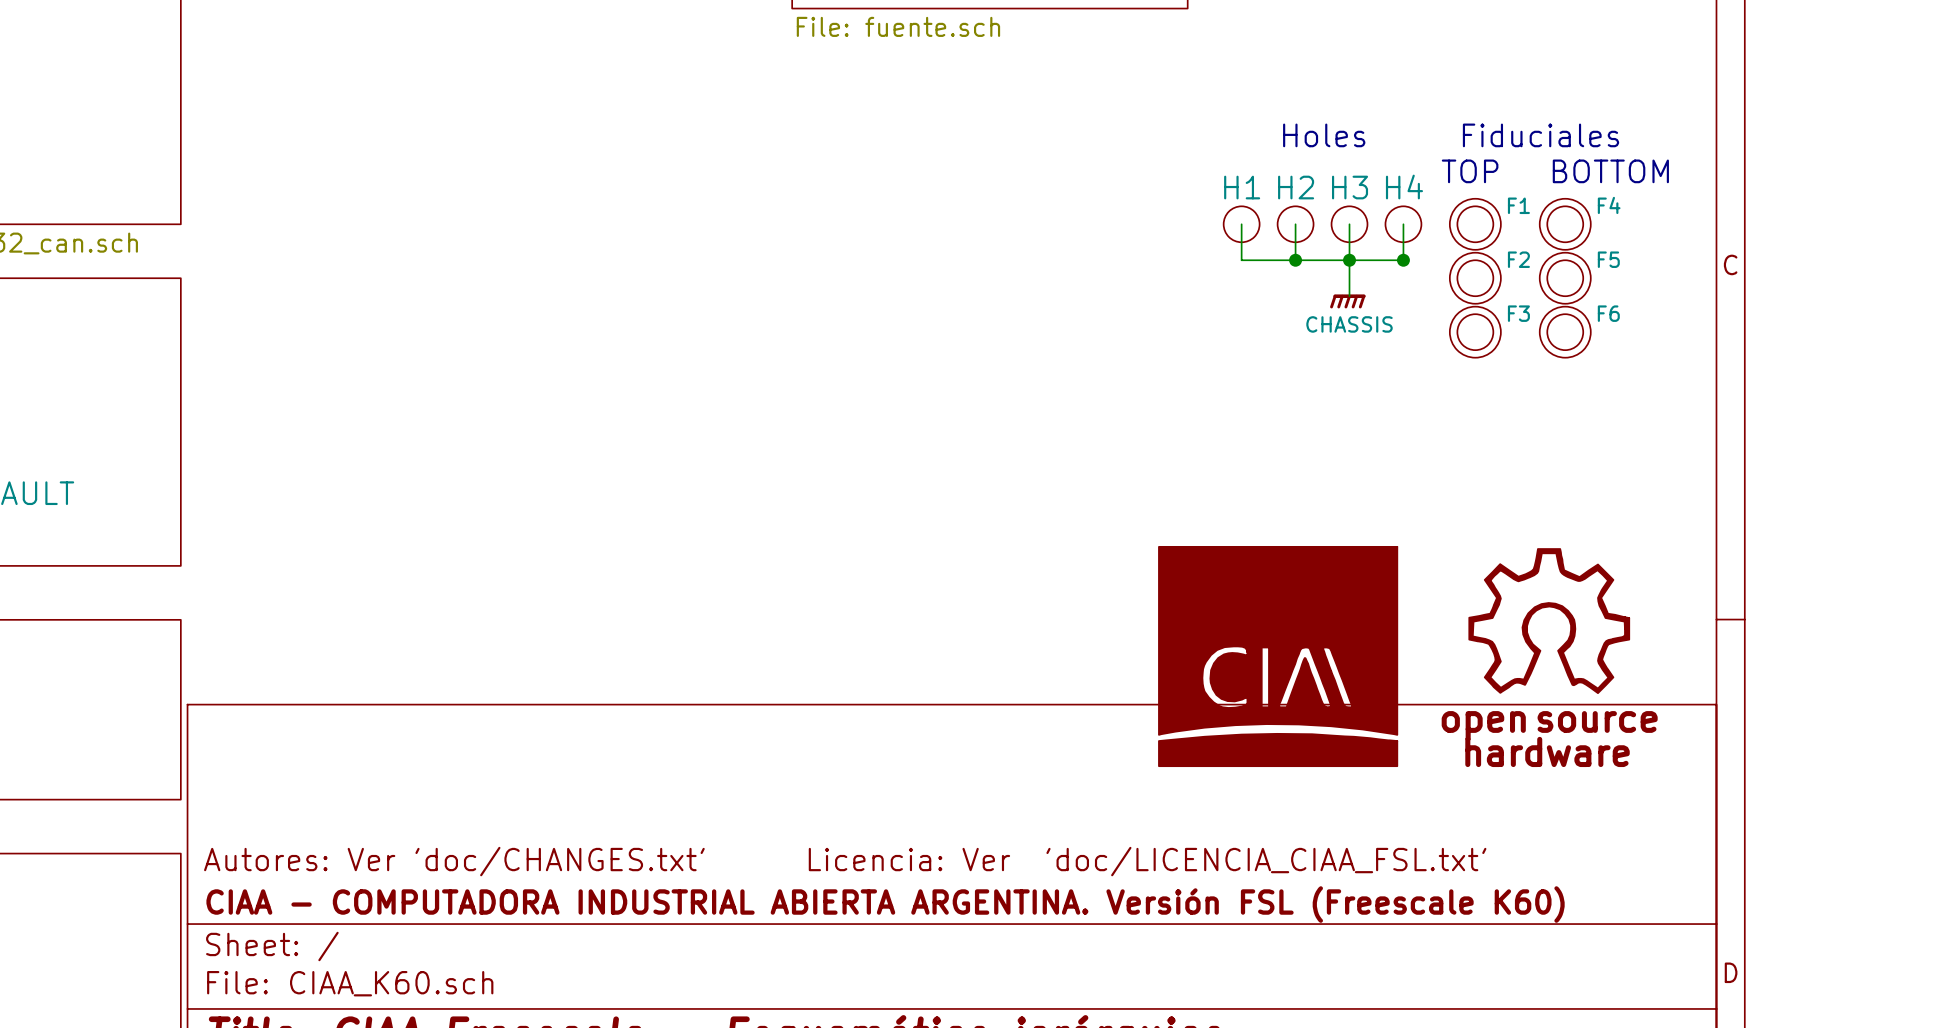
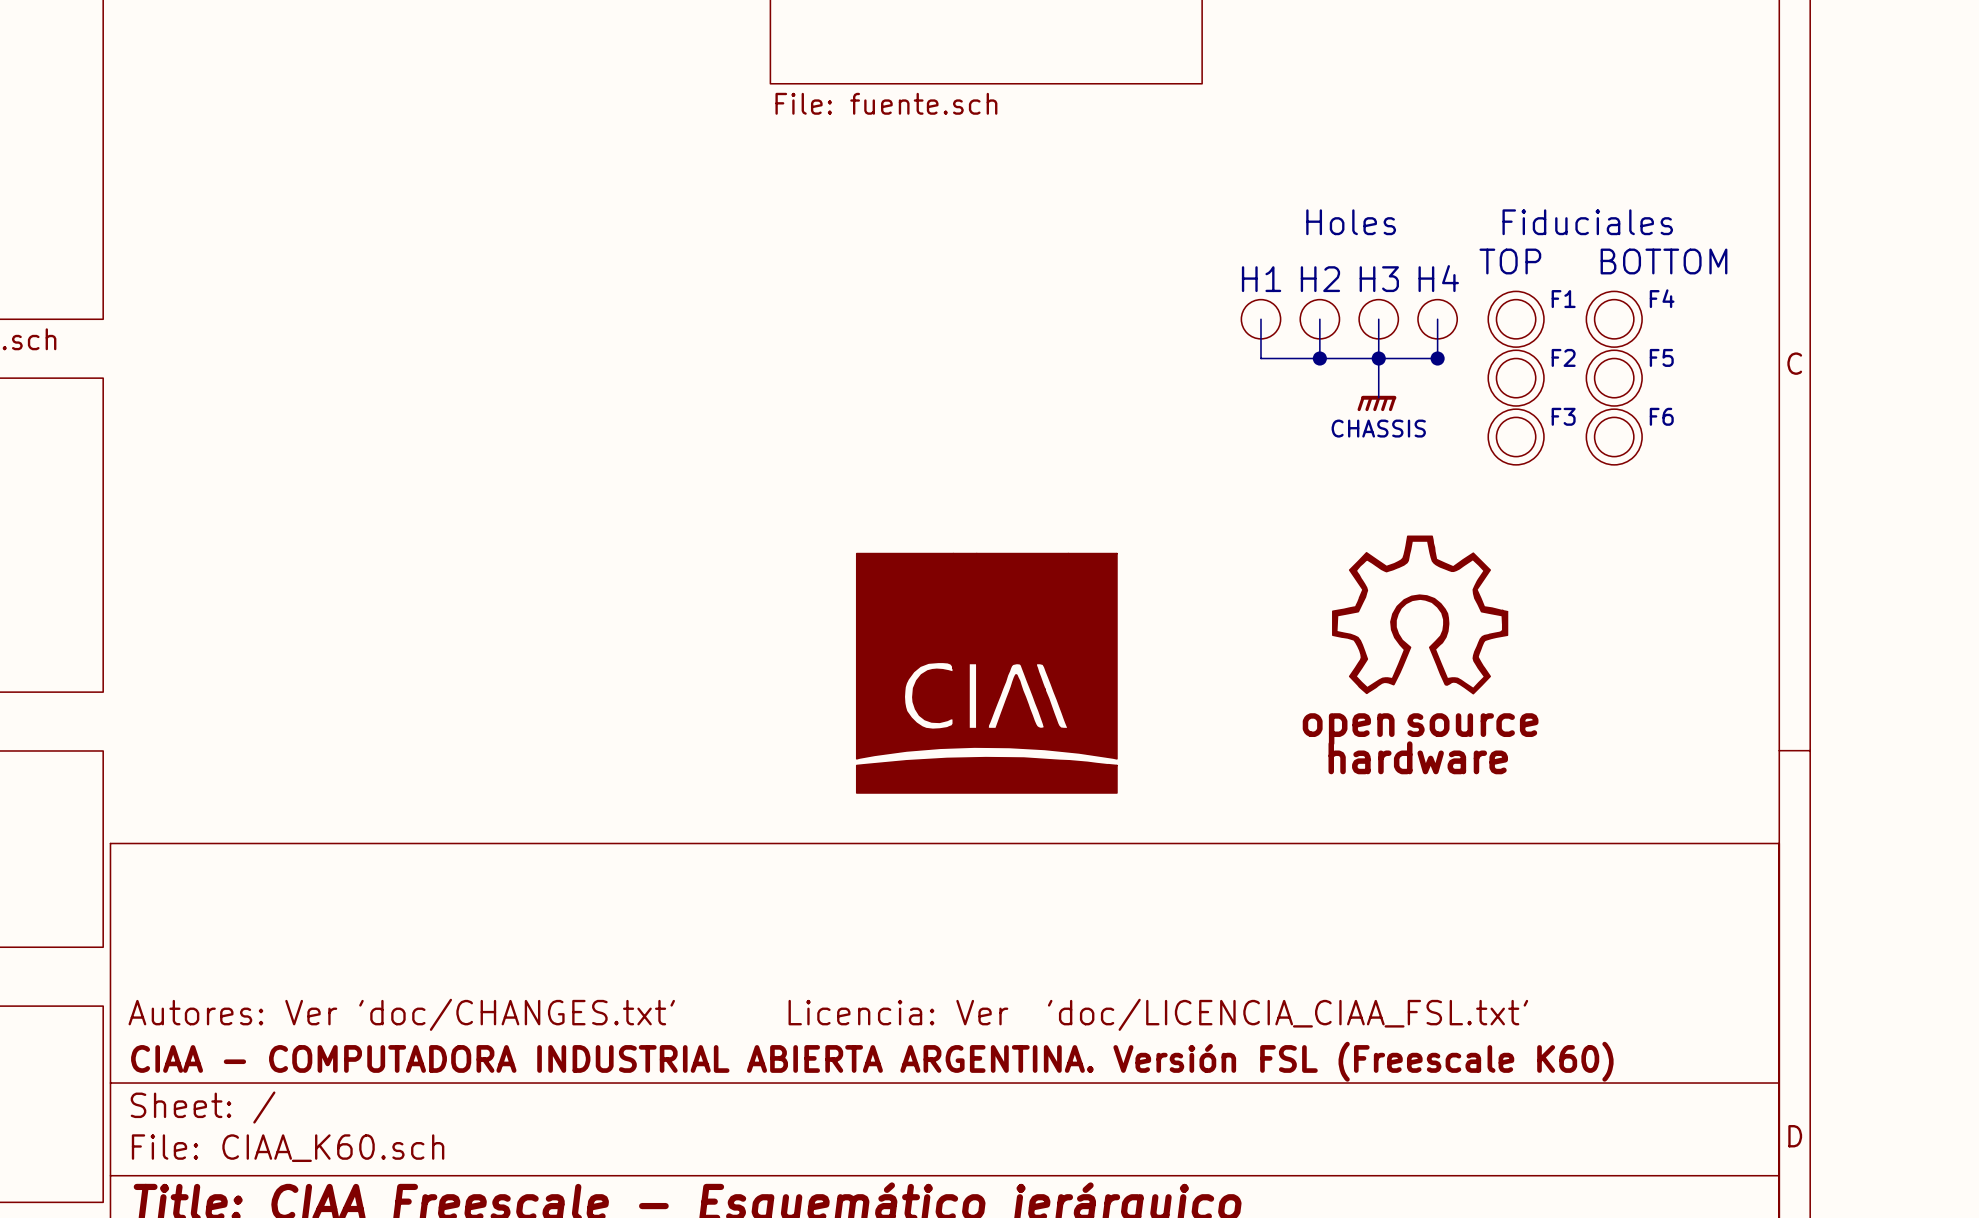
part position: (1549, 621) -> (1420, 615)
part position: (1278, 656) -> (986, 673)

